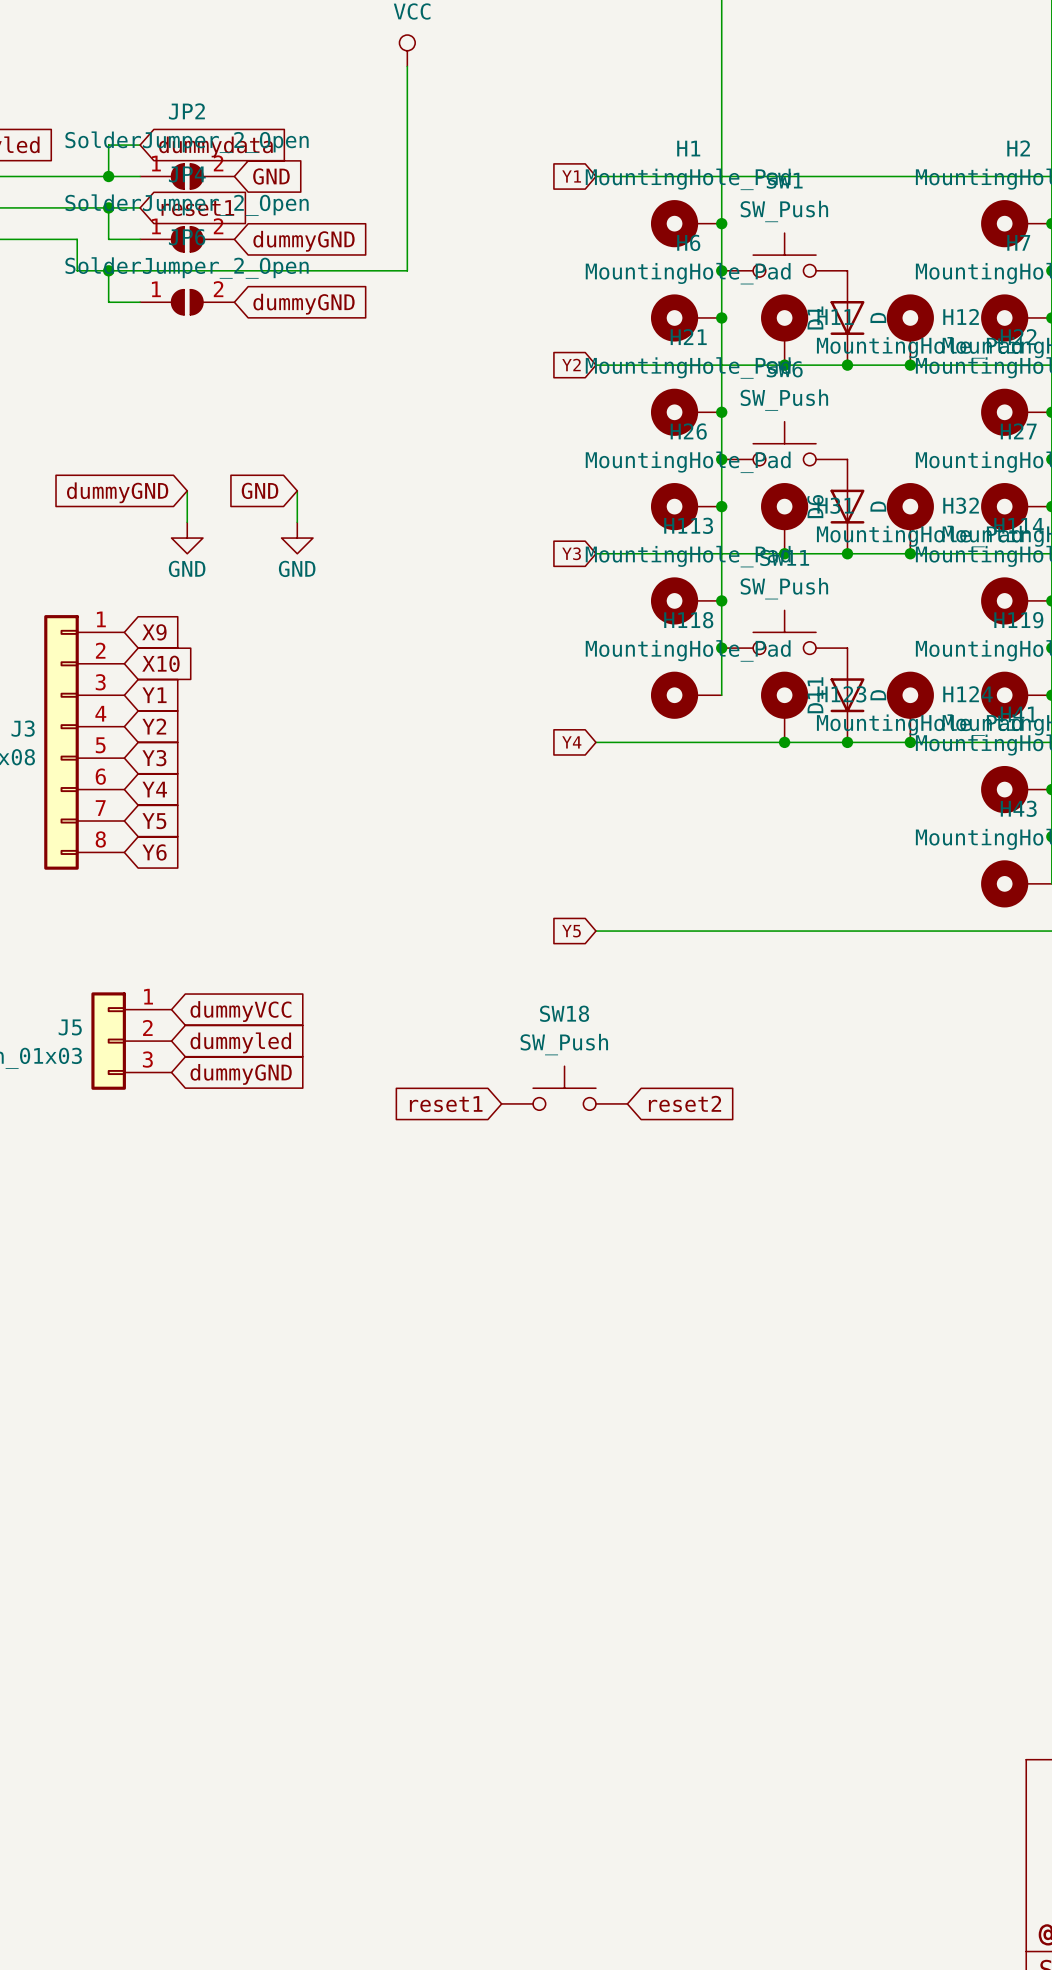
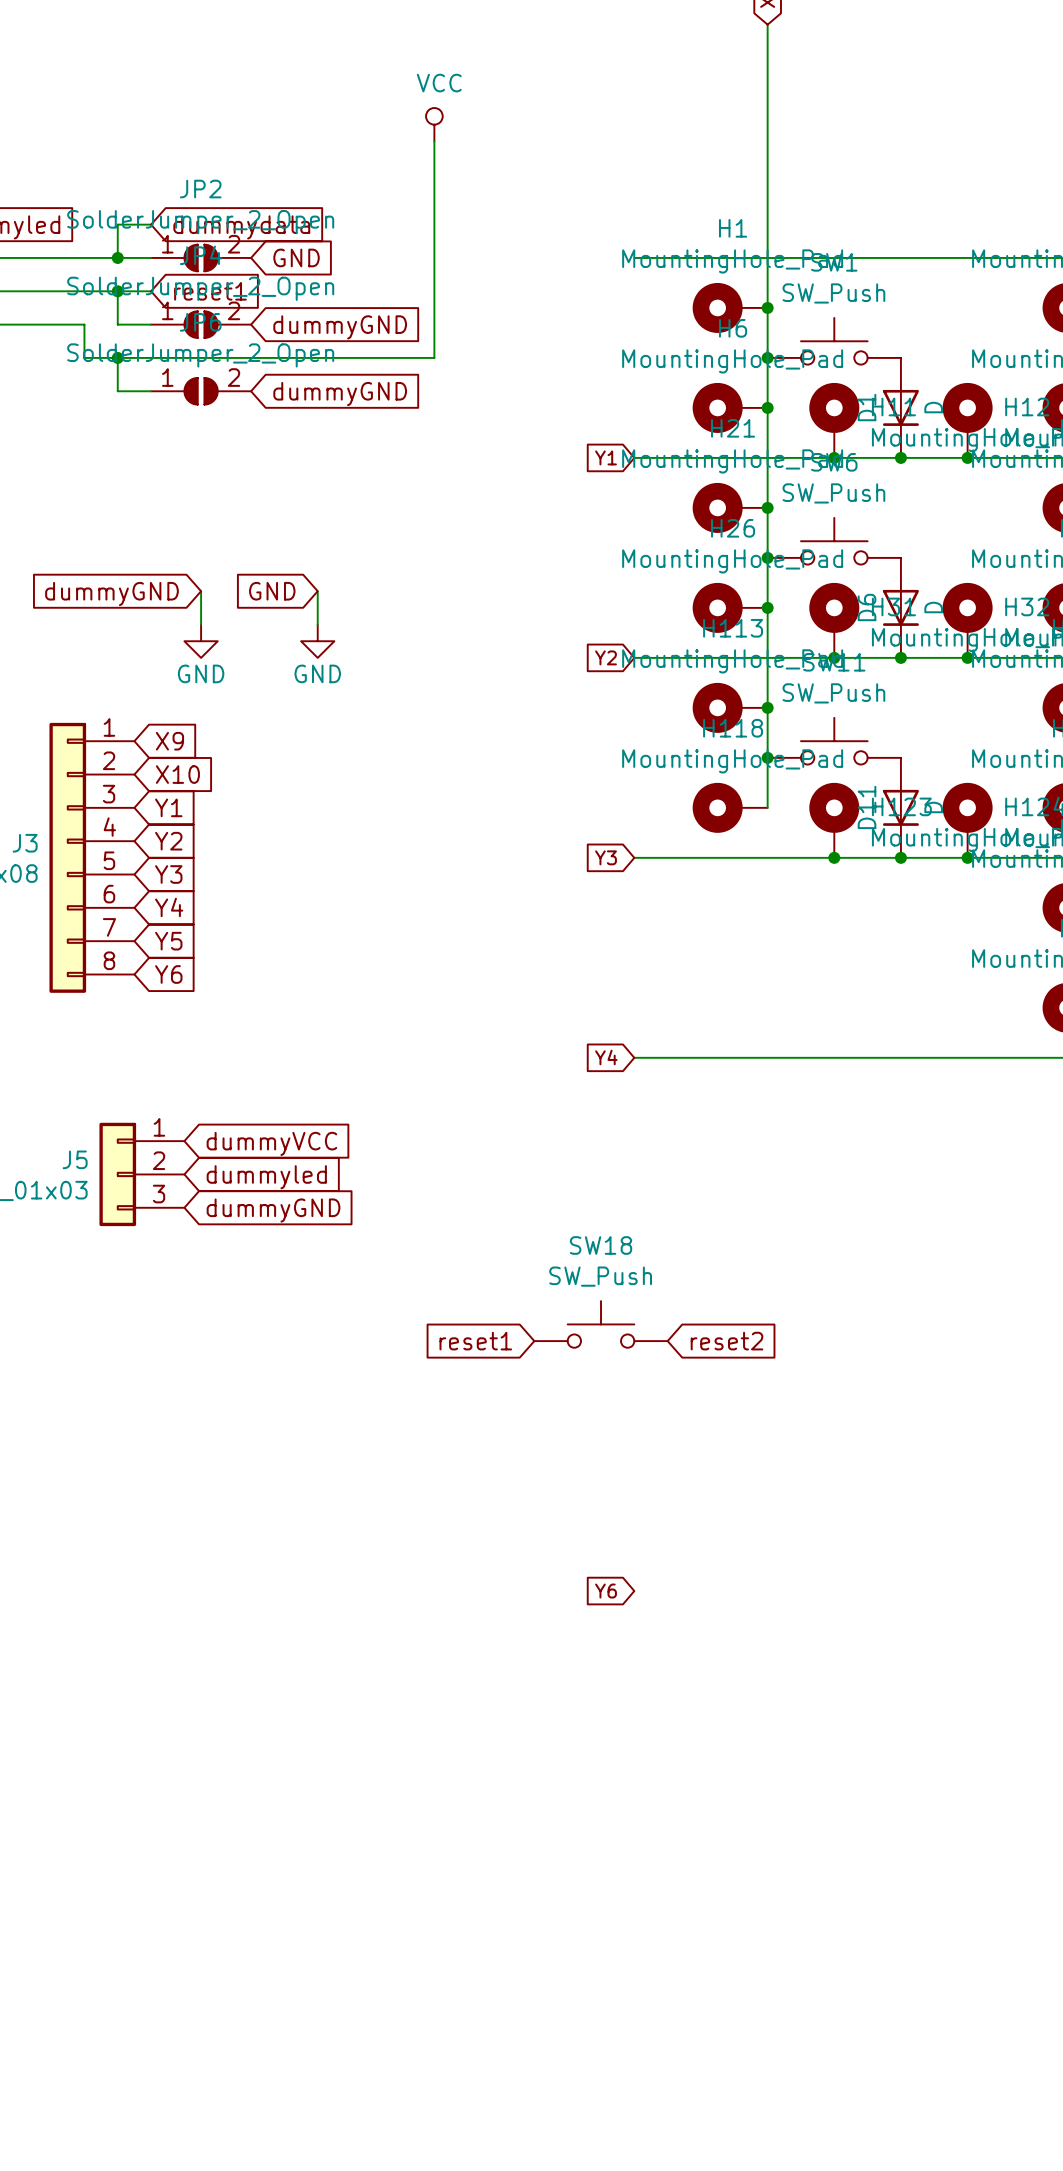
global label: Y1 (571, 176) -> none
global label: Y2 (571, 365) -> Y1 (606, 457)
global label: Y3 (571, 553) -> Y2 (606, 657)
global label: Y4 (571, 742) -> Y3 (606, 857)
global label: Y5 (571, 931) -> Y4 (606, 1057)
SW18 position: (564, 1088) -> (601, 1324)
global label position: reset2 (685, 1103) -> reset2 (727, 1341)
global label position: reset1 (446, 1104) -> reset1 (475, 1341)
global label: none -> Y6 (606, 1591)

